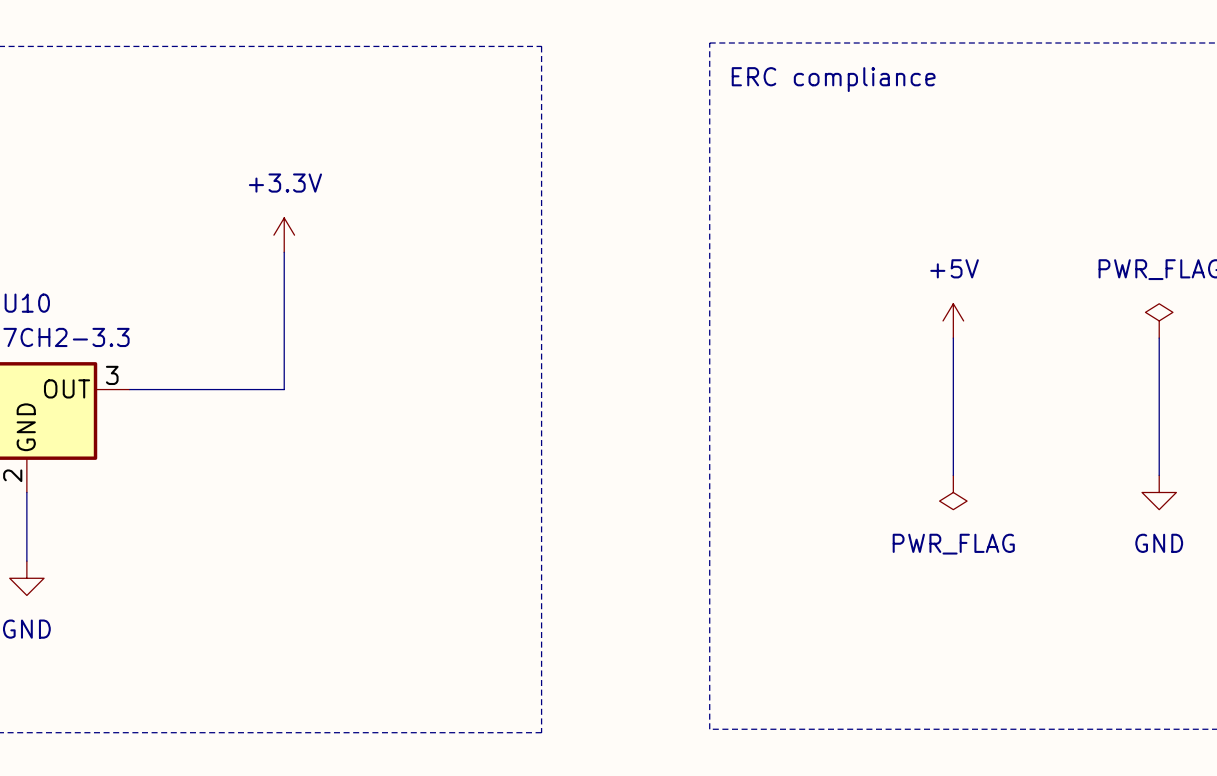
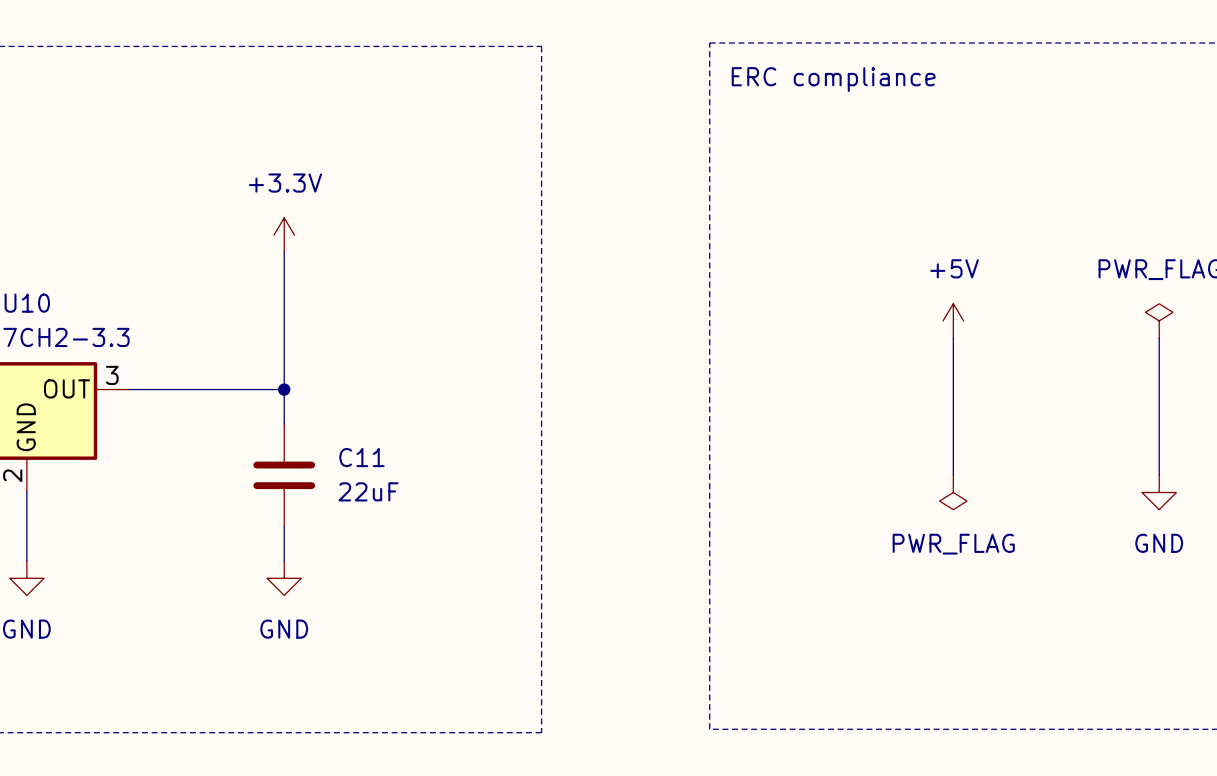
wire: none -> (284, 389) (284, 423)
junction: none -> (284, 389)
C11: none -> 22uF (284, 475)
wire: none -> (284, 526) (284, 561)
power symbol: none -> GND (284, 578)

